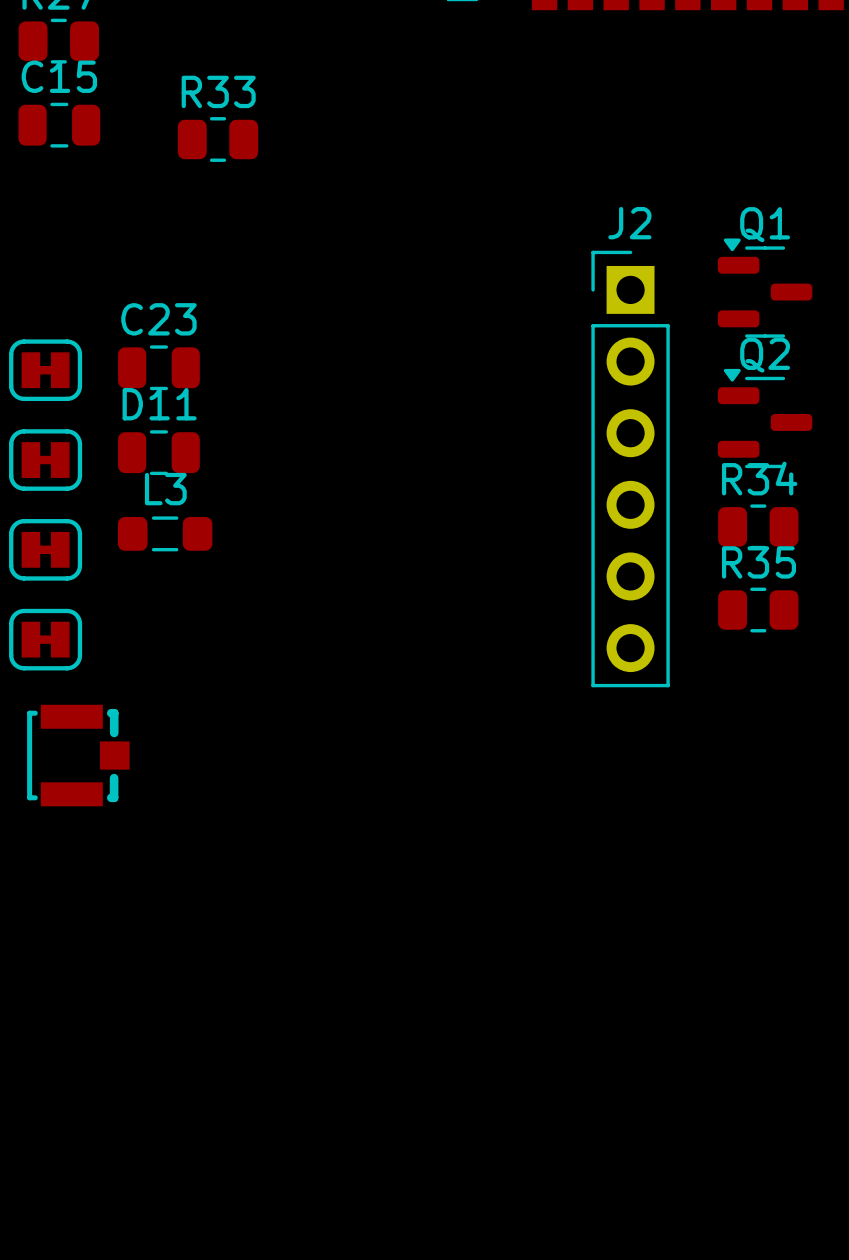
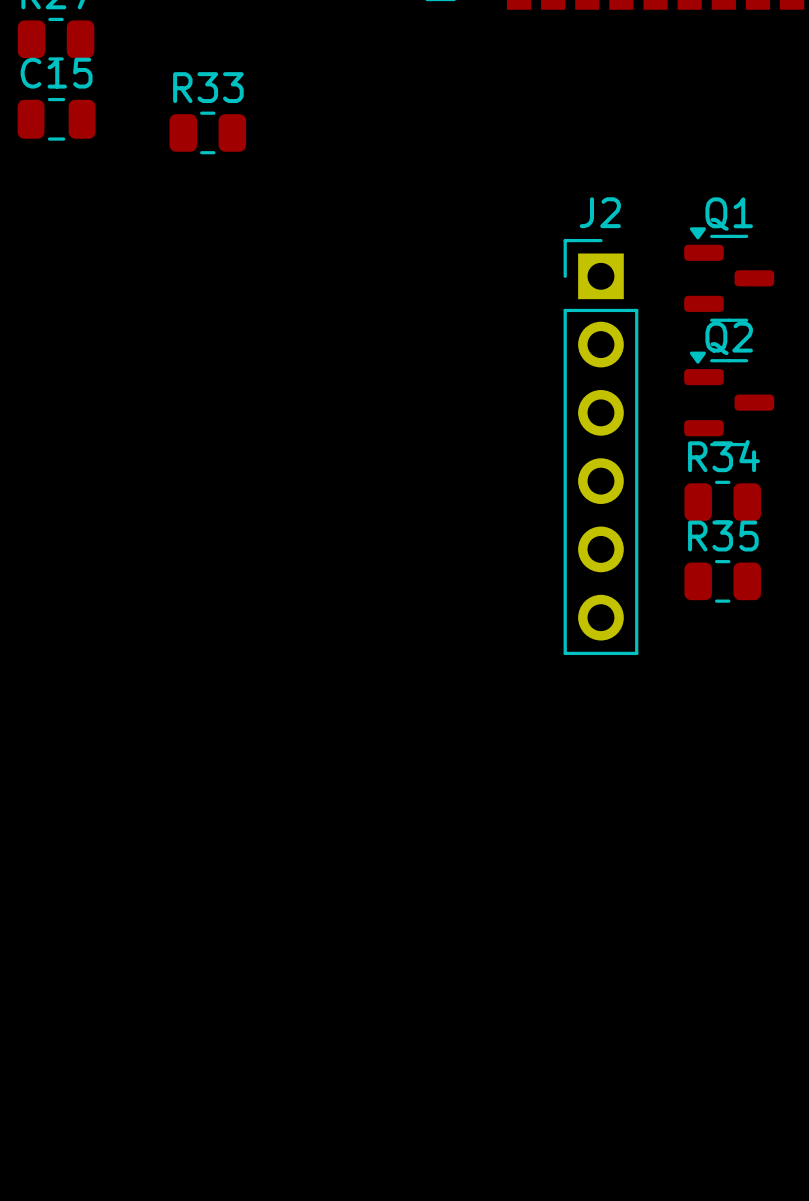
C23: (158, 367) -> none
part: (45, 370) -> none
D11: (158, 452) -> none
part: (45, 460) -> none
L3: (165, 533) -> none
part: (45, 549) -> none
part: (45, 639) -> none
part: (78, 755) -> none

